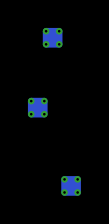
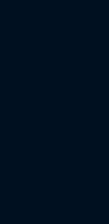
part: (52, 37) -> none
part: (37, 107) -> none
part: (71, 185) -> none

